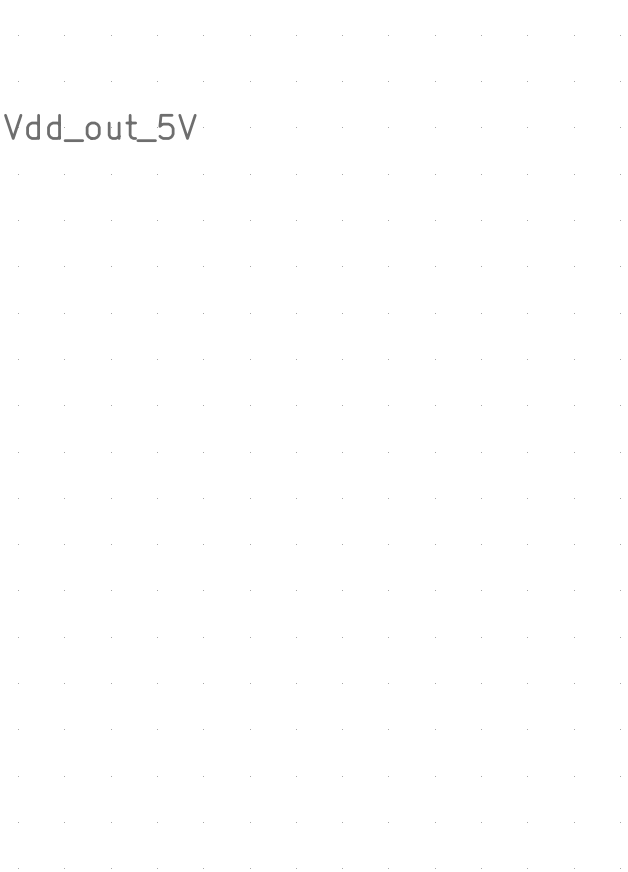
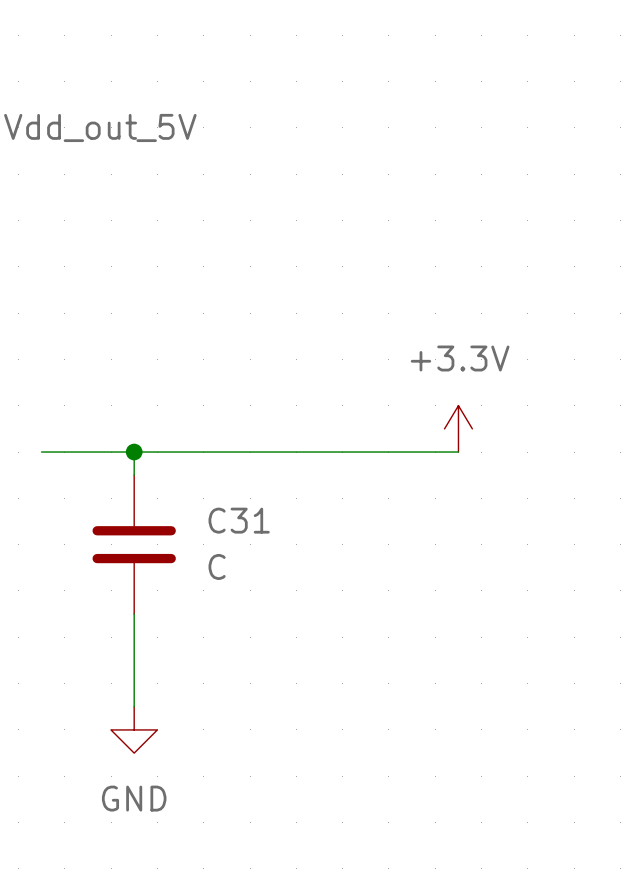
power symbol: none -> +3.3V (458, 428)
wire: none -> (41, 452) (458, 452)
wire: none -> (134, 452) (134, 475)
junction: none -> (134, 452)
C31: none -> C (134, 544)
wire: none -> (134, 614) (134, 706)
power symbol: none -> GND (134, 729)

